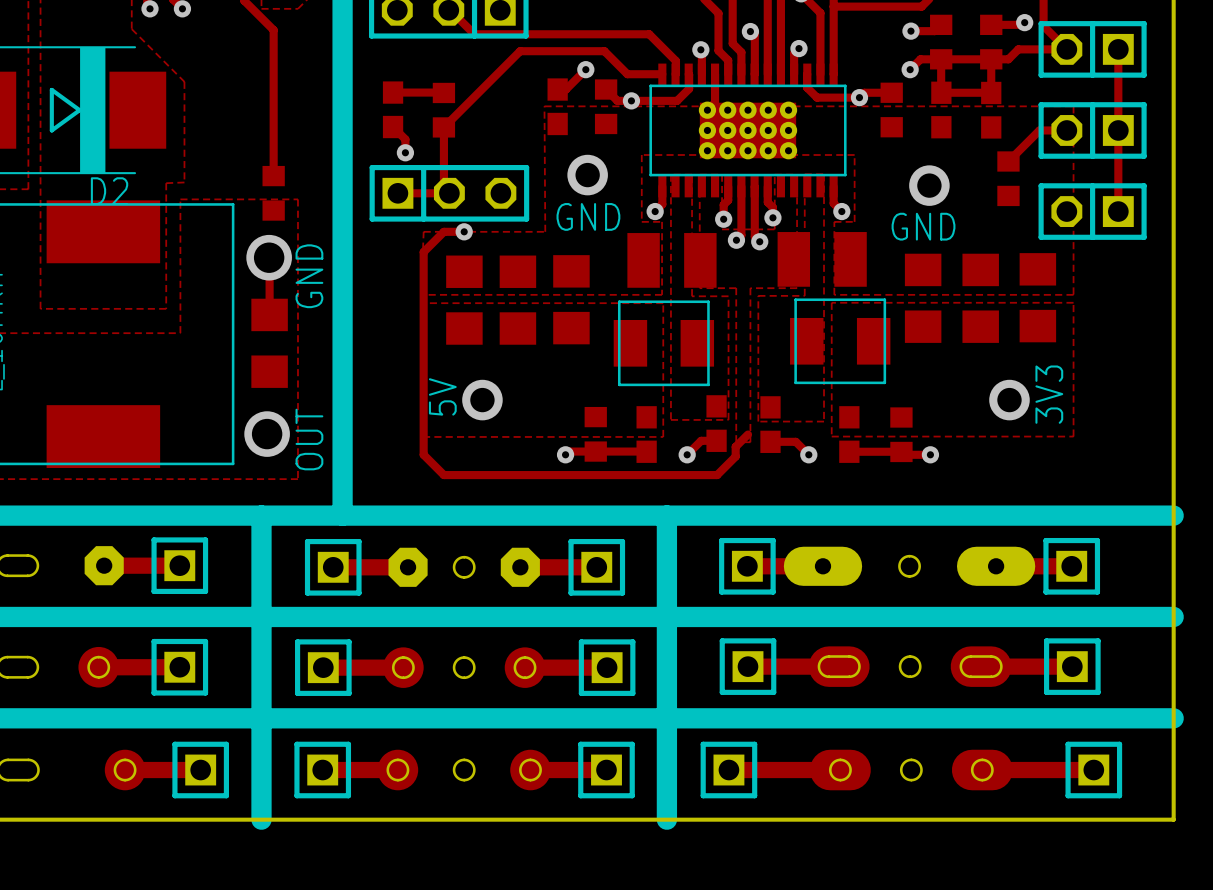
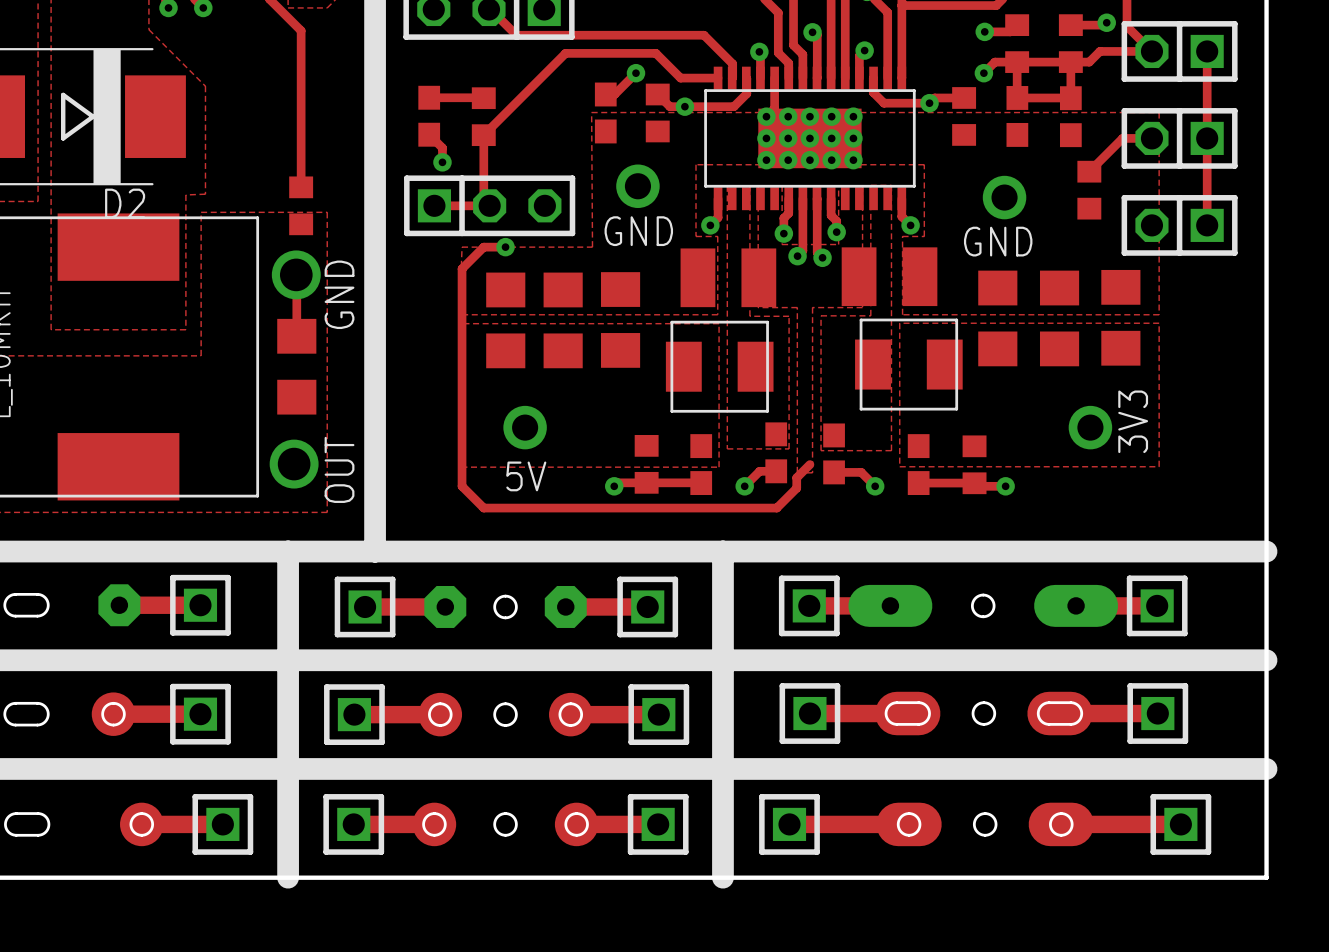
text rotation: 0° (442, 396) -> 90° clockwise (526, 476)
text position: 5V (442, 396) -> 5V (526, 476)

